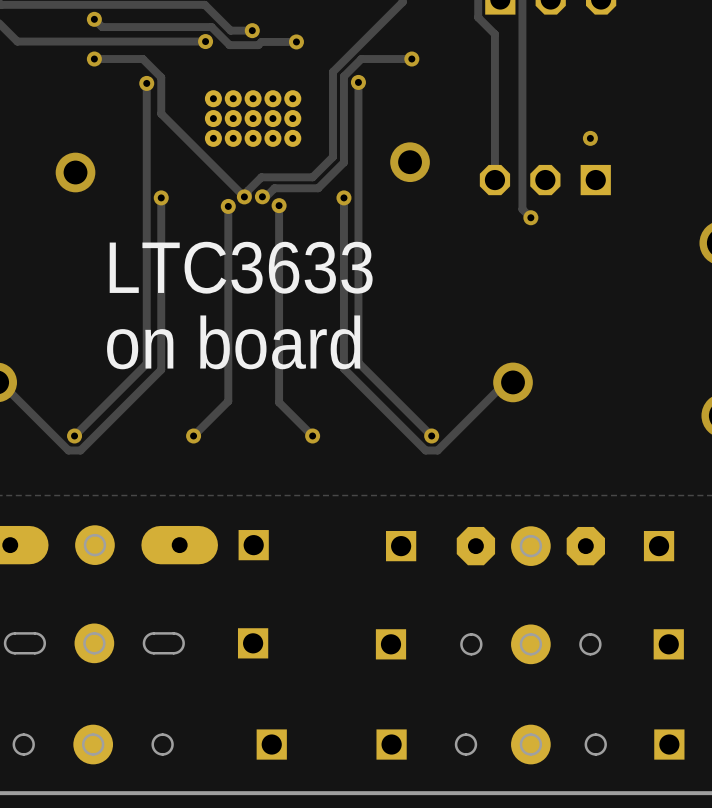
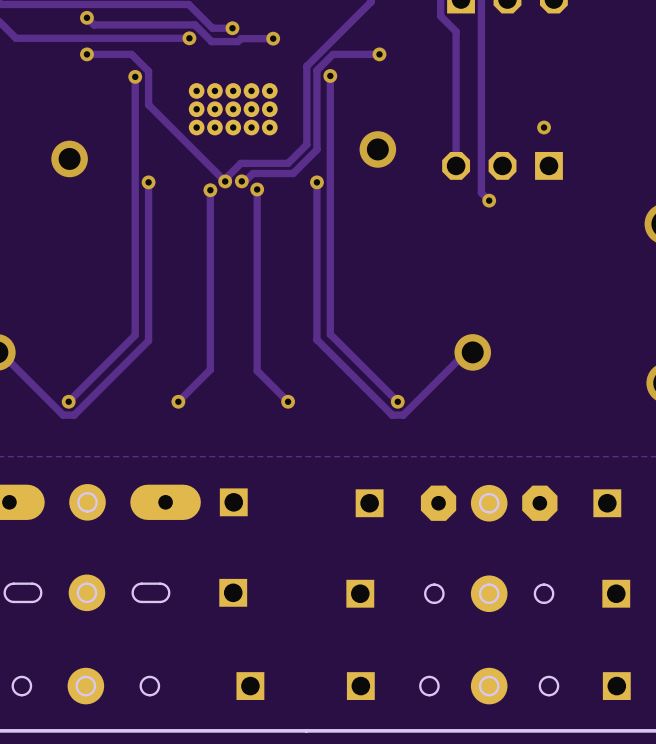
text: LTC3633 (241, 267) -> none
text: on board (233, 342) -> none

